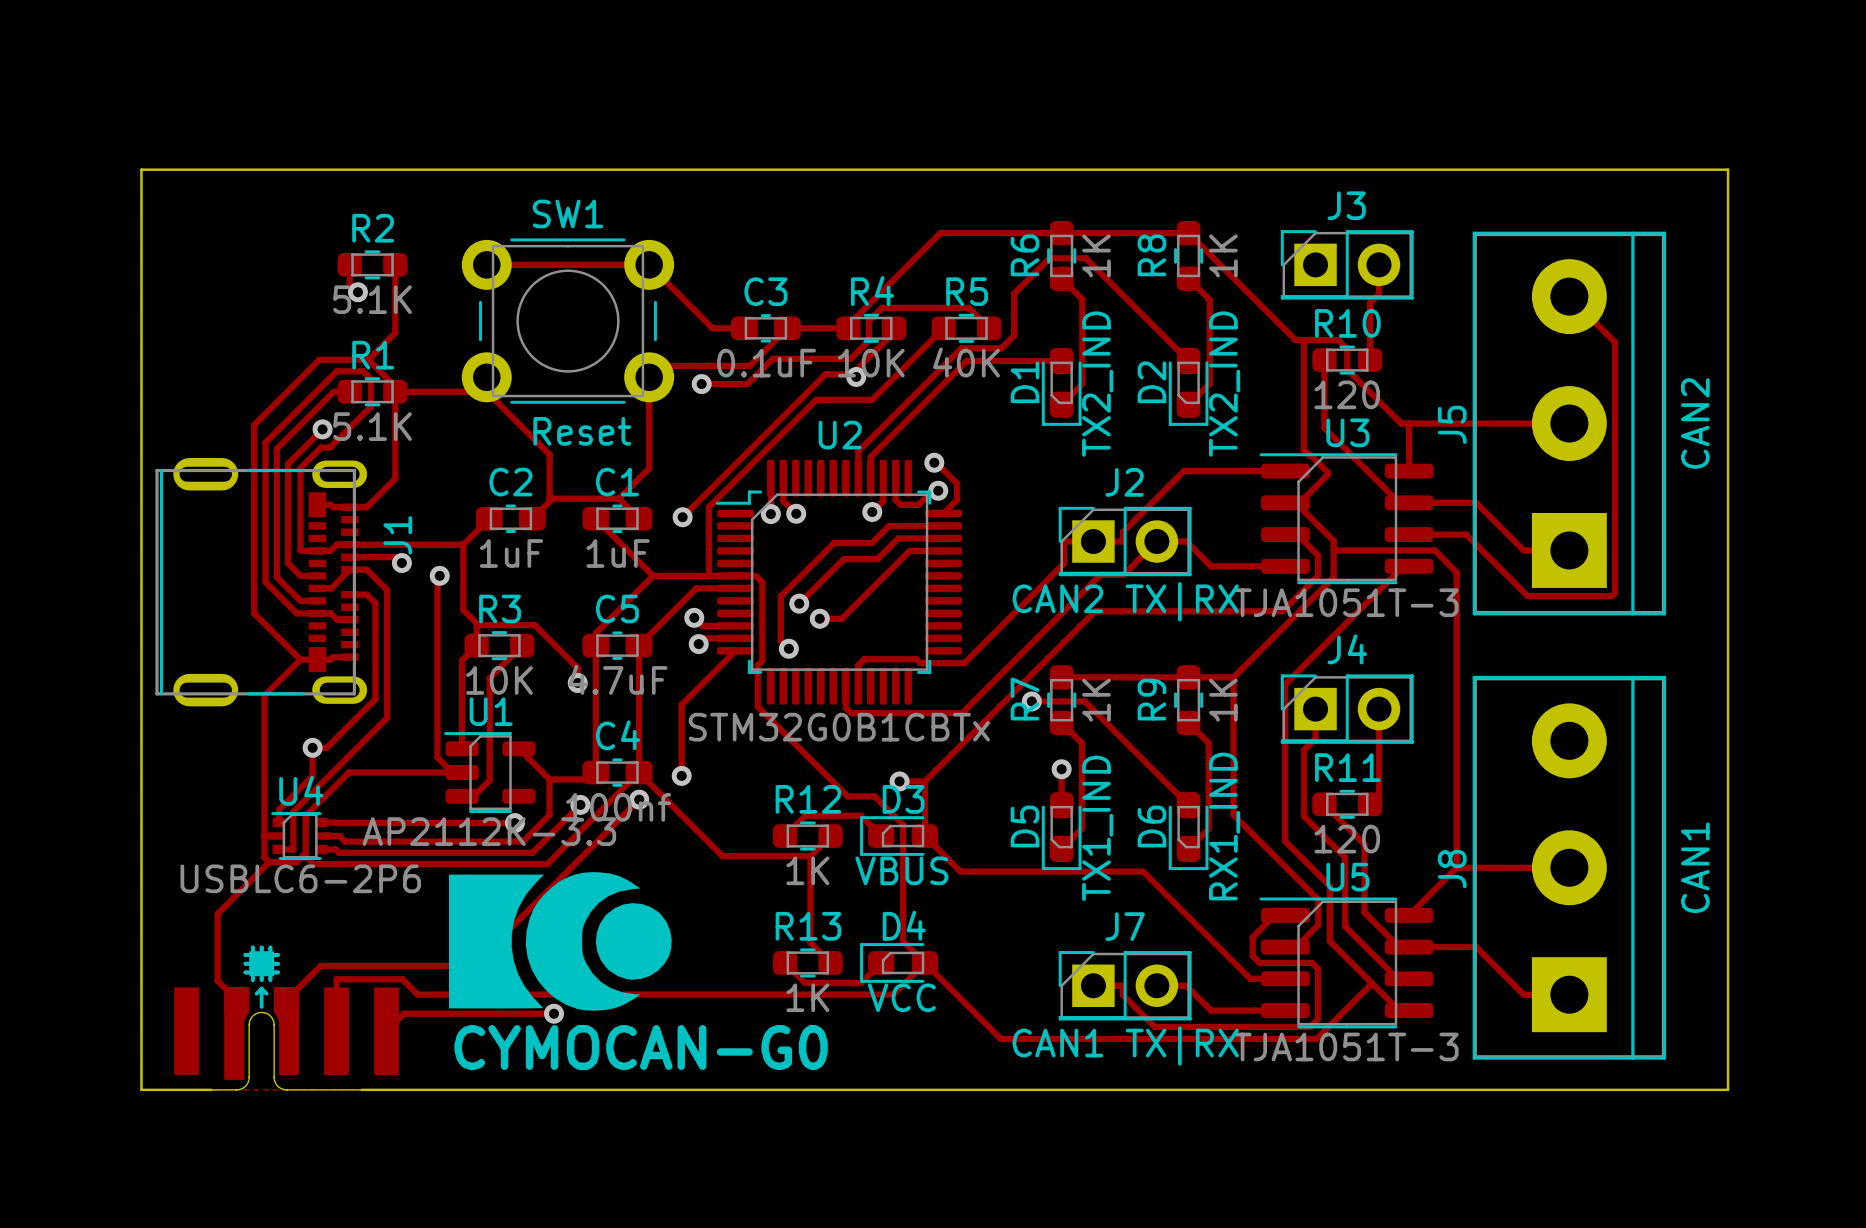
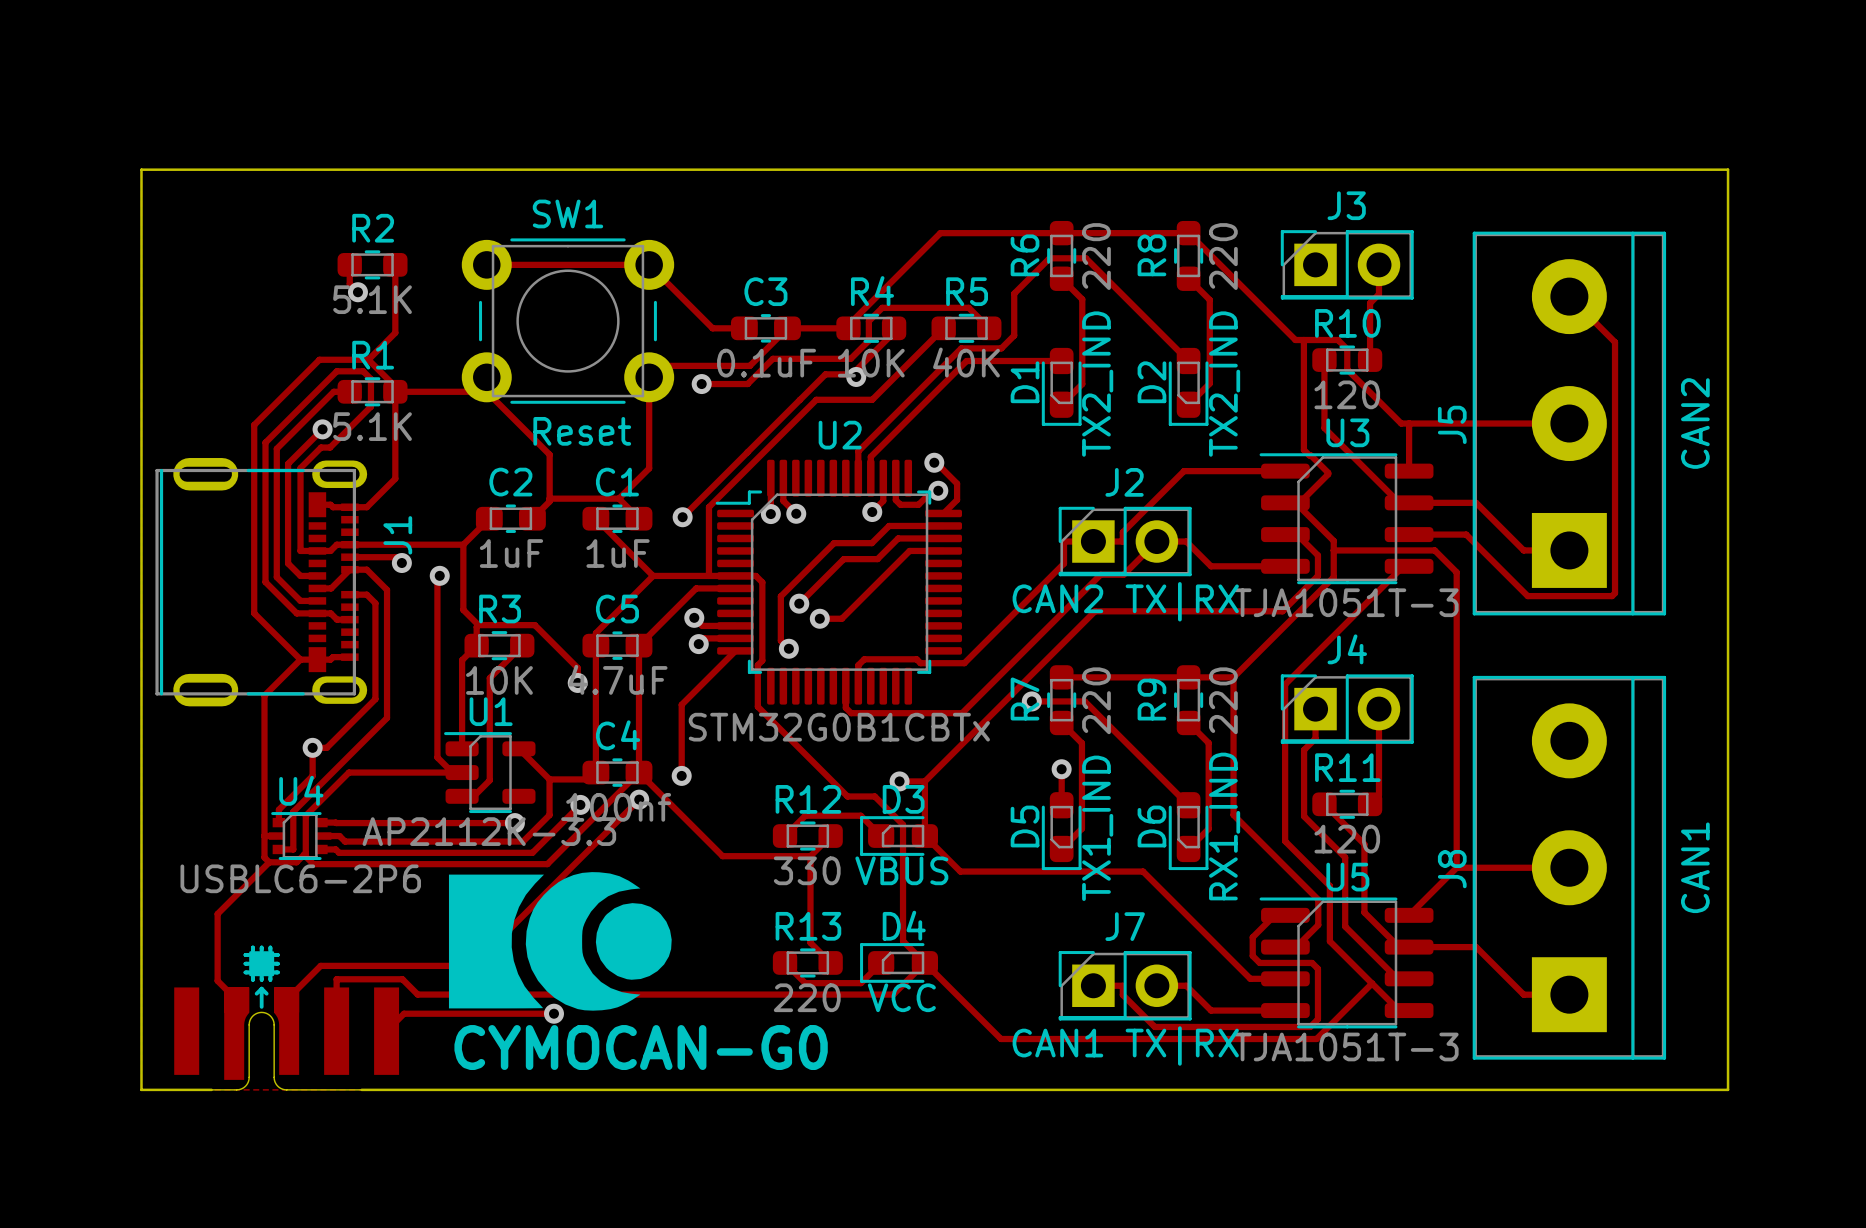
R6 value: 1K (1096, 255) -> 220 (1096, 256)
R8 value: 1K (1223, 255) -> 220 (1223, 256)
R7 value: 1K (1096, 700) -> 220 (1096, 700)
R9 value: 1K (1223, 700) -> 220 (1223, 700)
R12 value: 1K (807, 870) -> 330 (807, 870)
R13 value: 1K (807, 997) -> 220 (807, 997)

